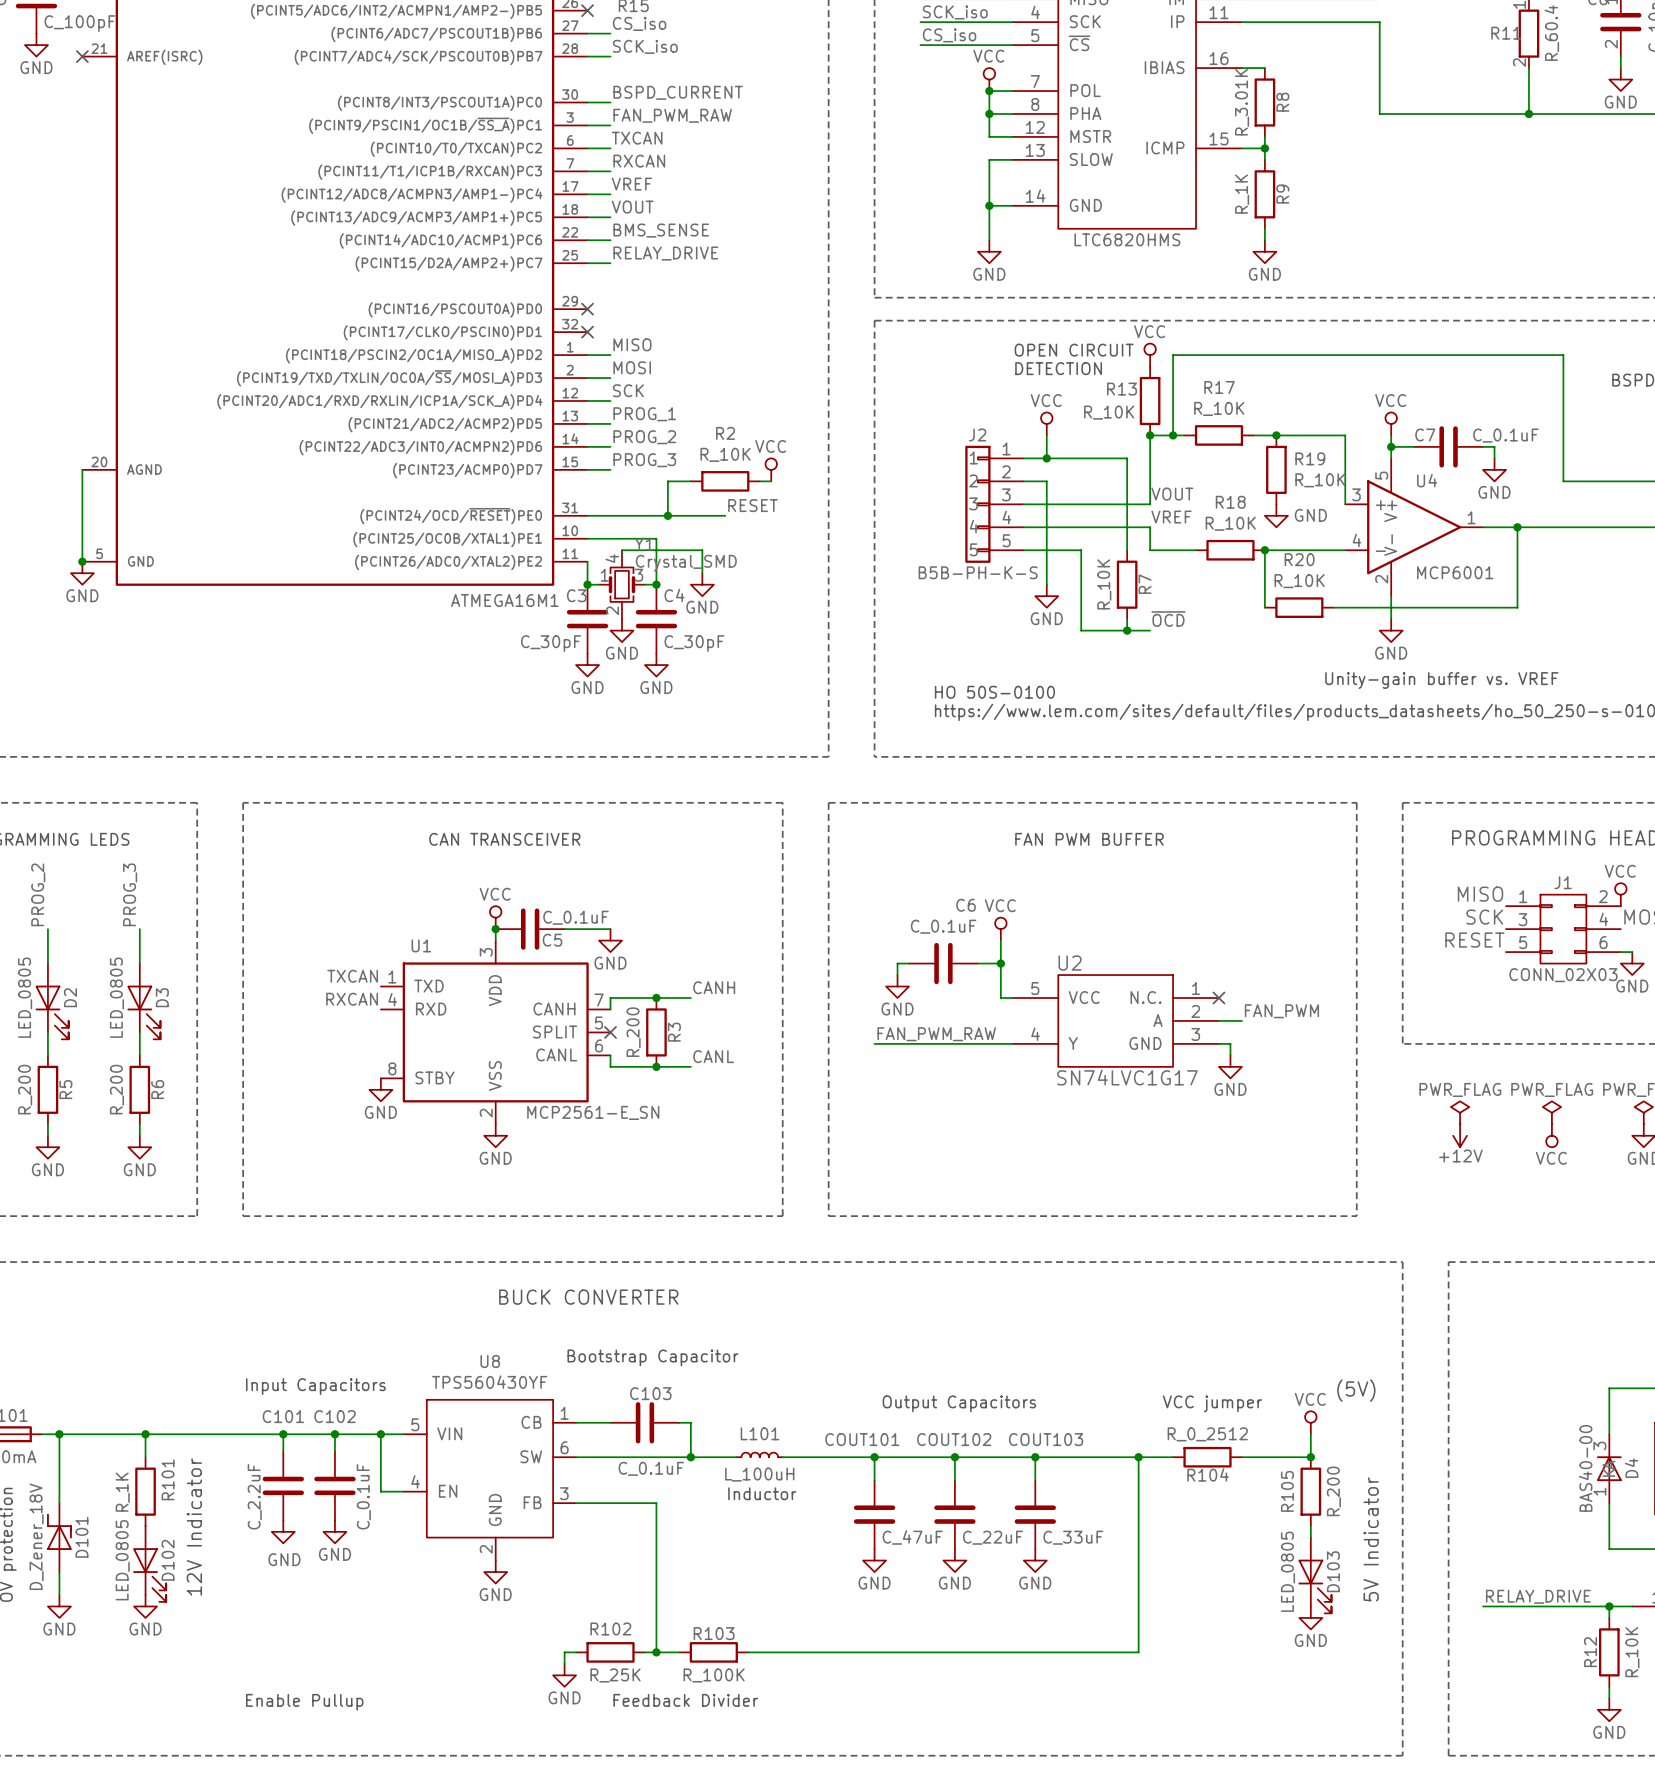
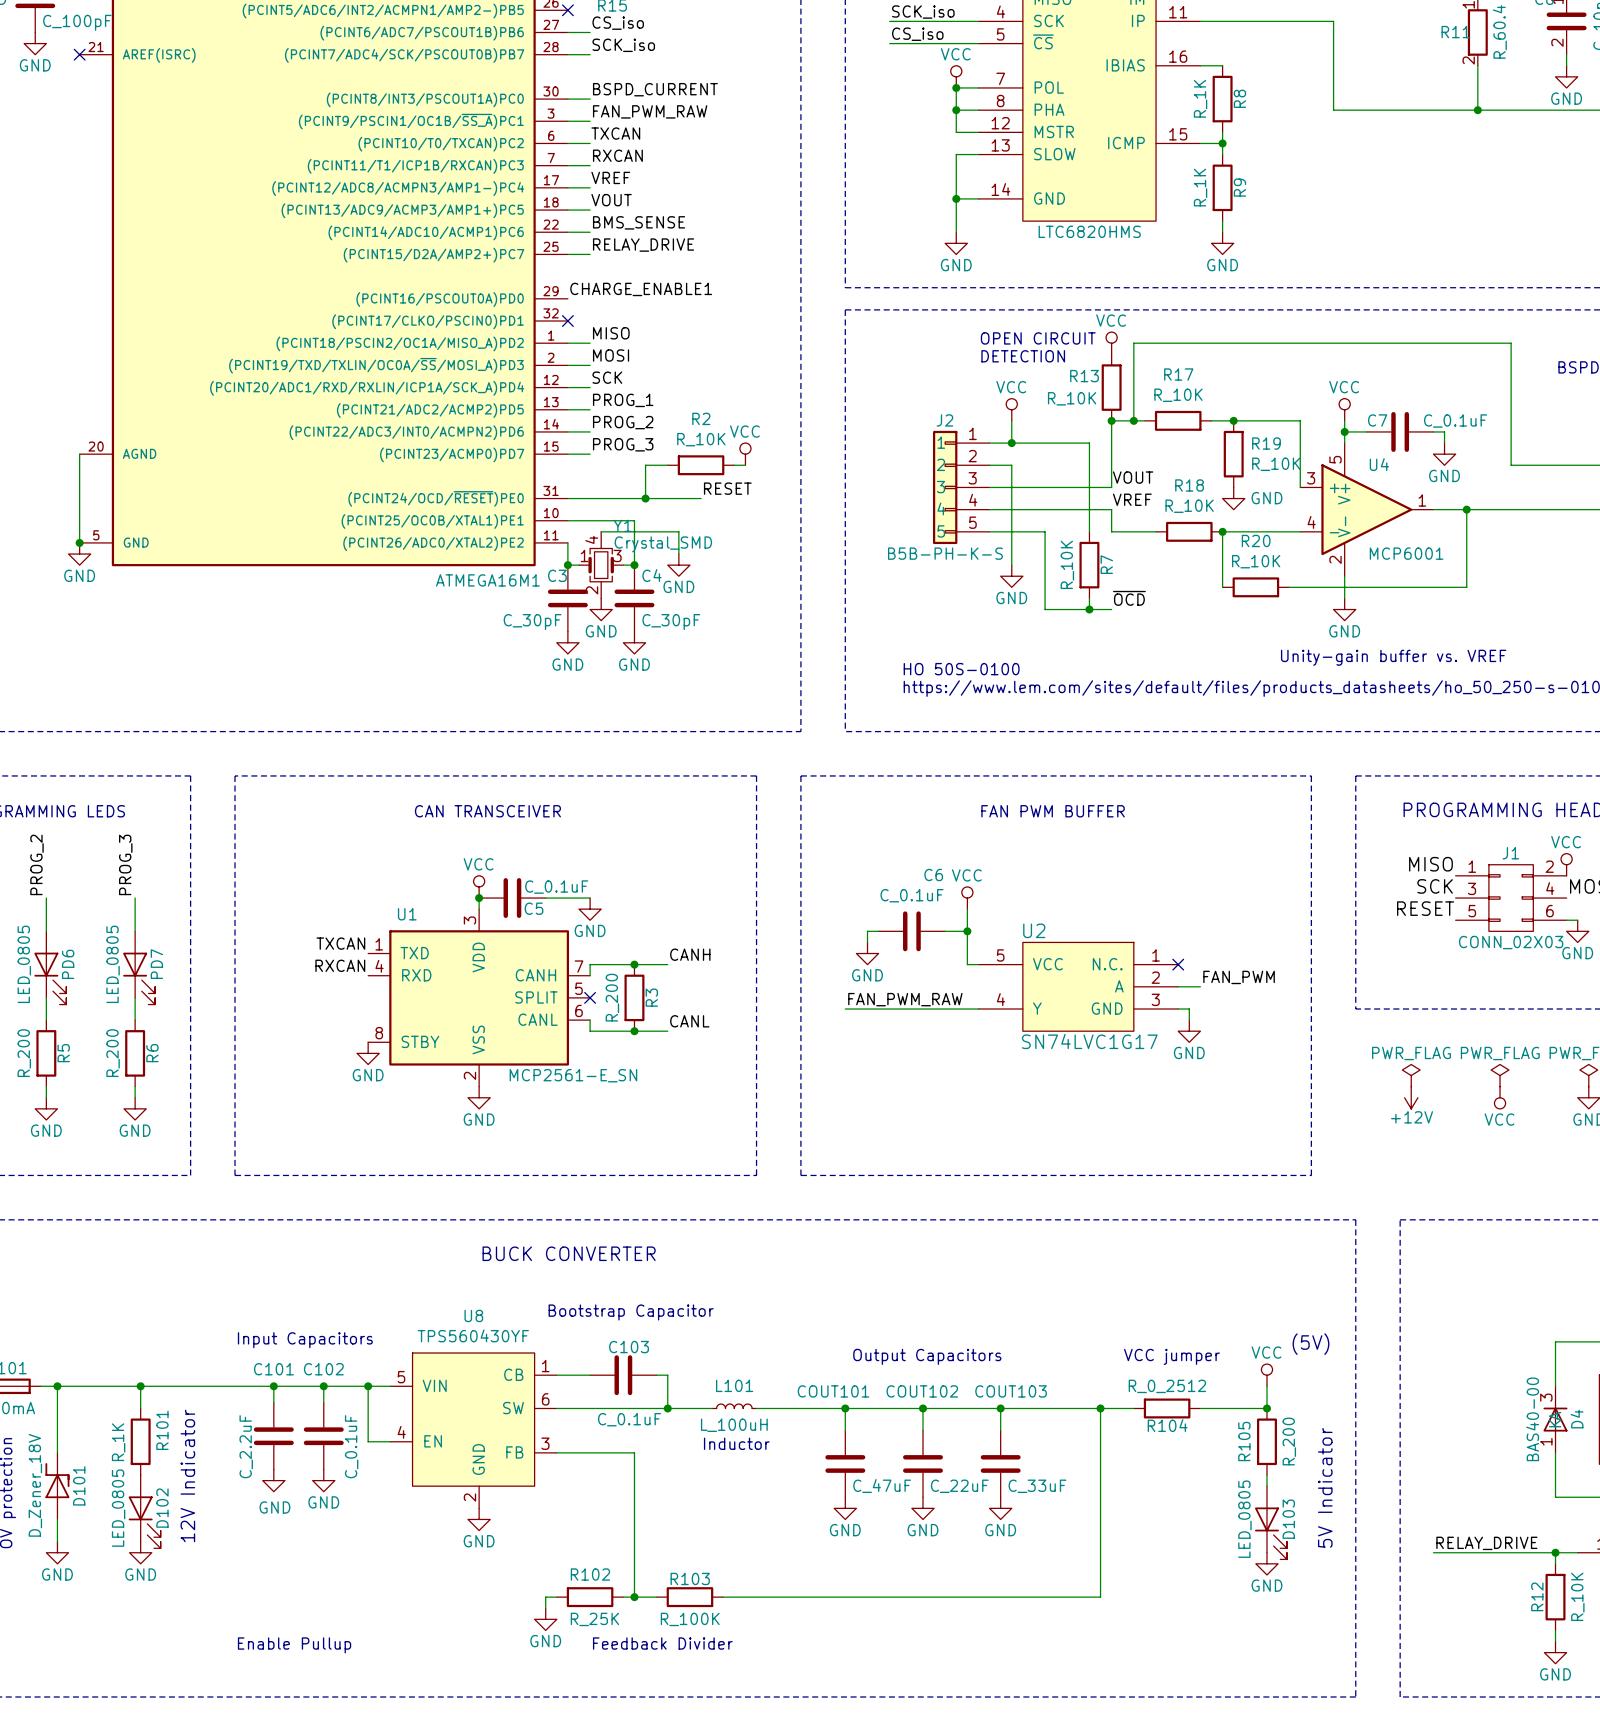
R8 value: R_3.01K (1242, 102) -> R_1K (1200, 98)
label: none -> CHARGE_ENABLE1 (641, 289)
no-connect mark: (587, 309) -> none
D2 name: D2 (70, 997) -> PD6 (68, 964)
D3 name: D3 (162, 997) -> PD7 (156, 964)

